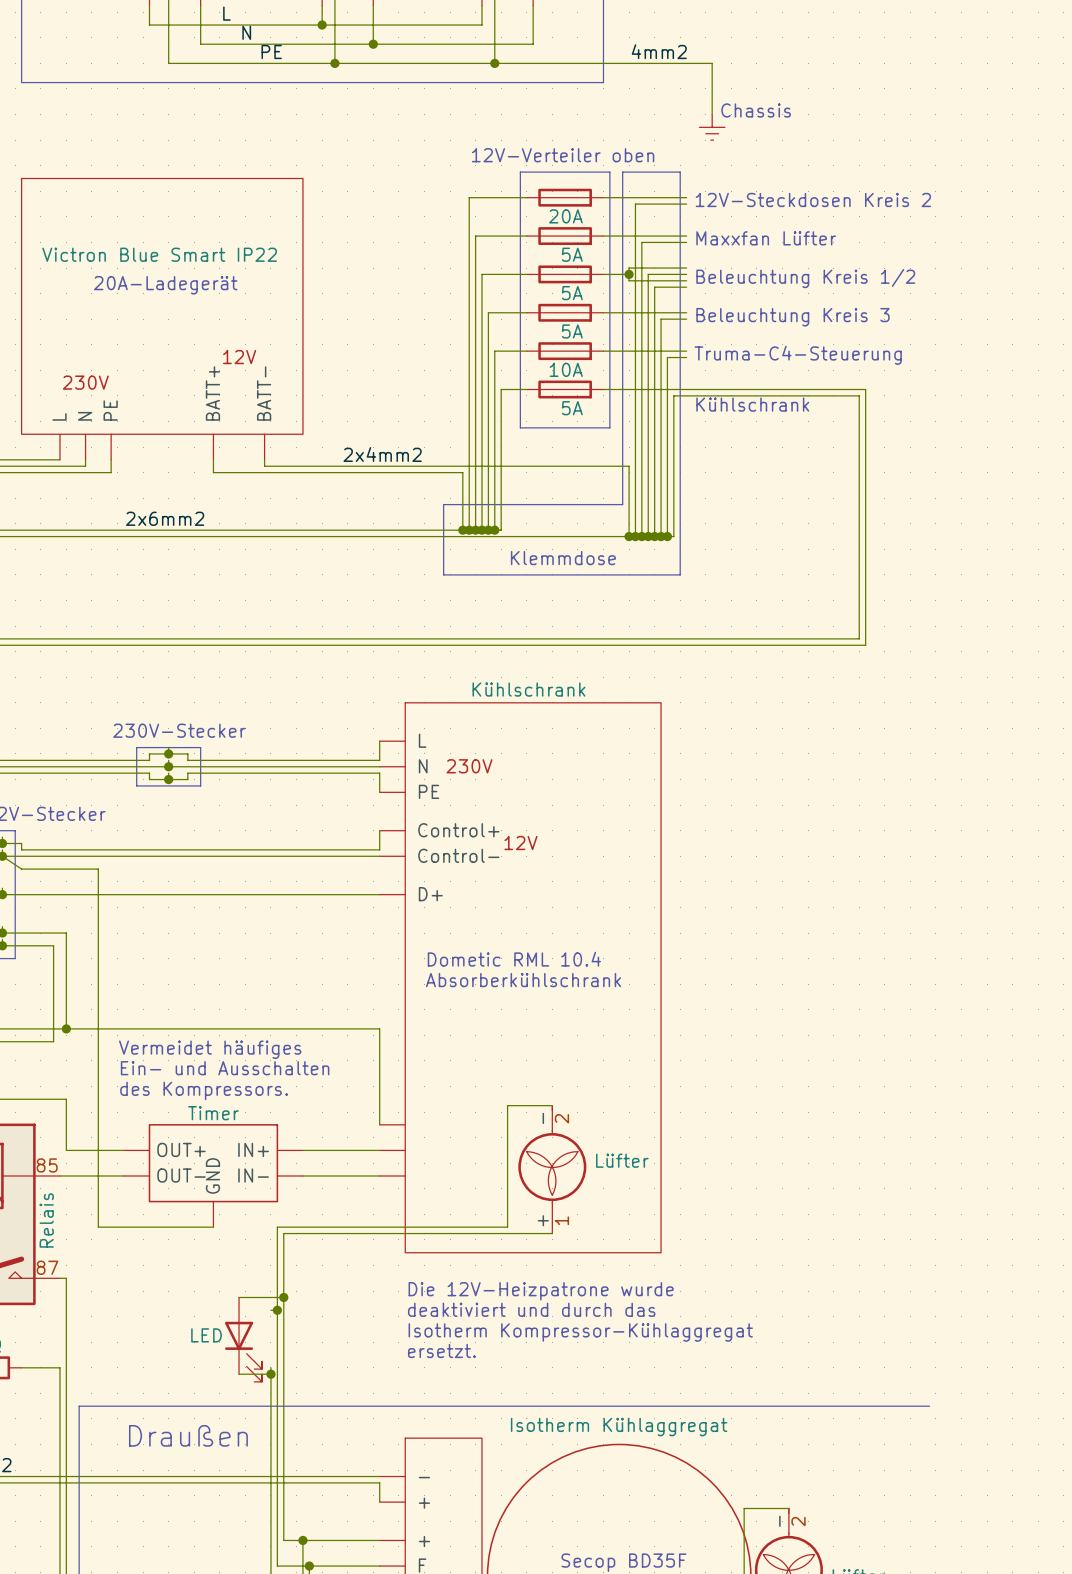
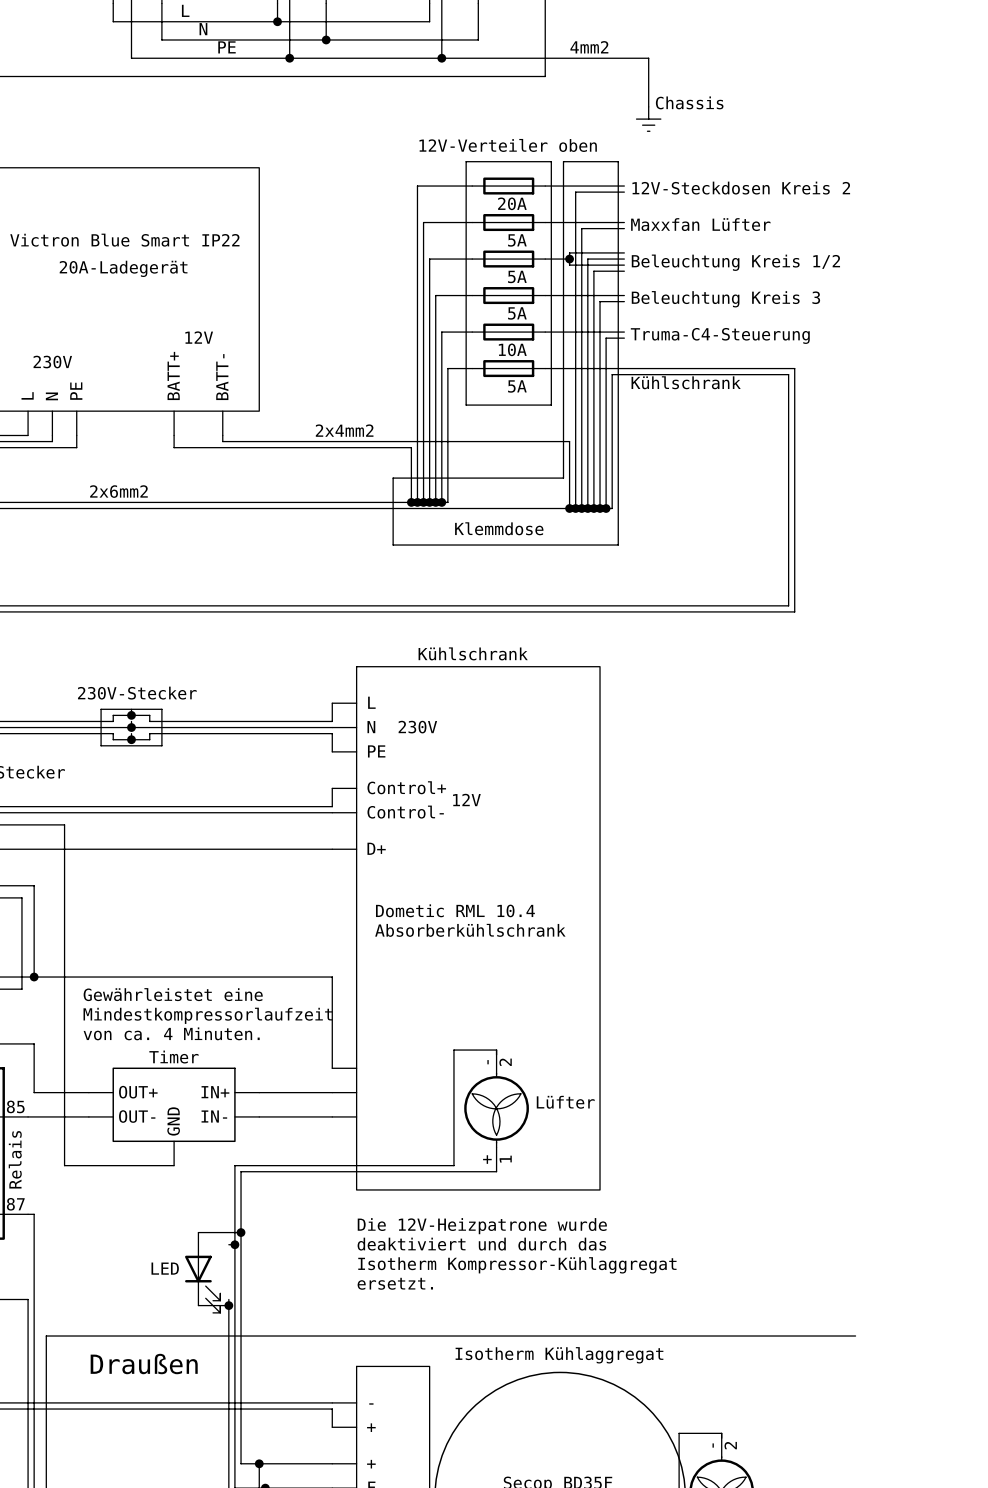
text: Vermeidet häufiges (210, 1049) -> Gewährleistet eine (173, 994)
text: Ein- und Ausschalten (225, 1068) -> Mindestkompressorlaufzeit (207, 1015)
text: des Kompressors. (204, 1090) -> von ca. 4 Minuten. (171, 1033)

